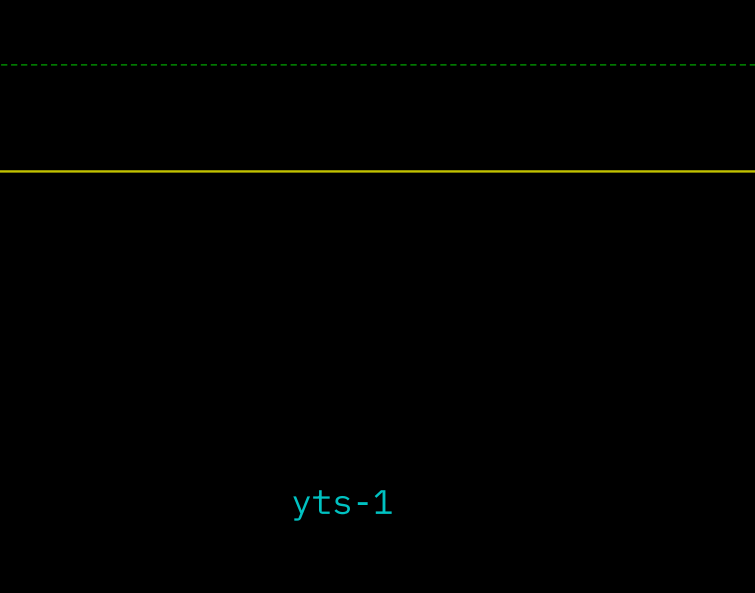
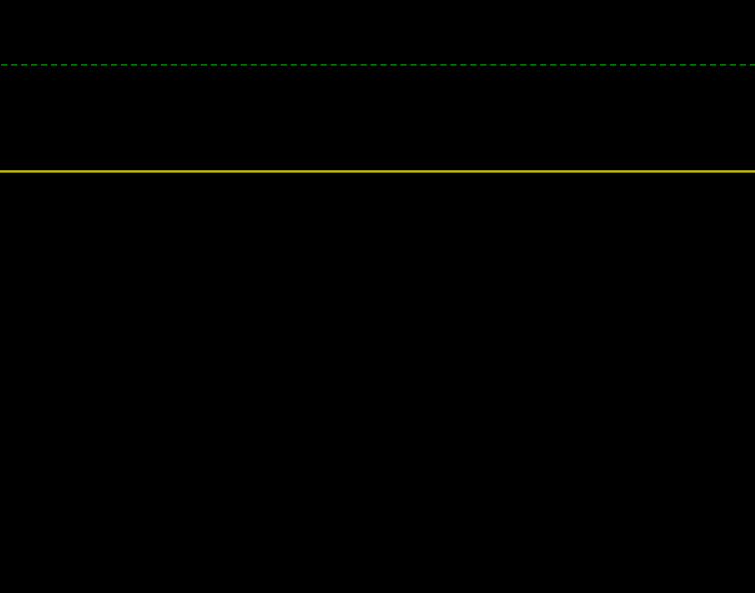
text: yts-1 (342, 505) -> none

